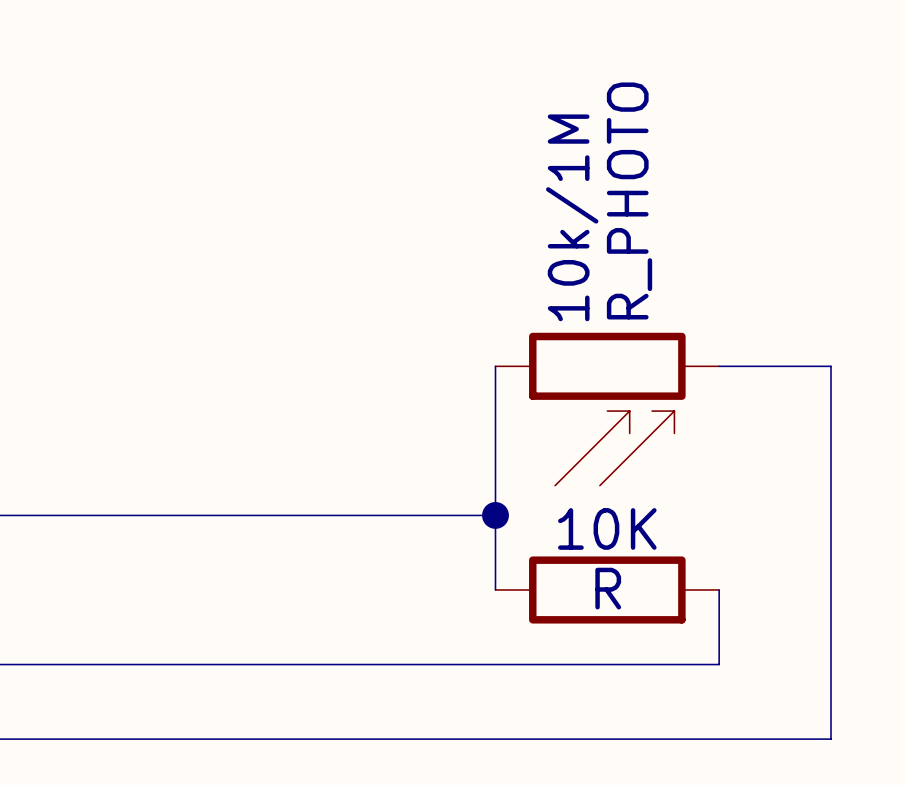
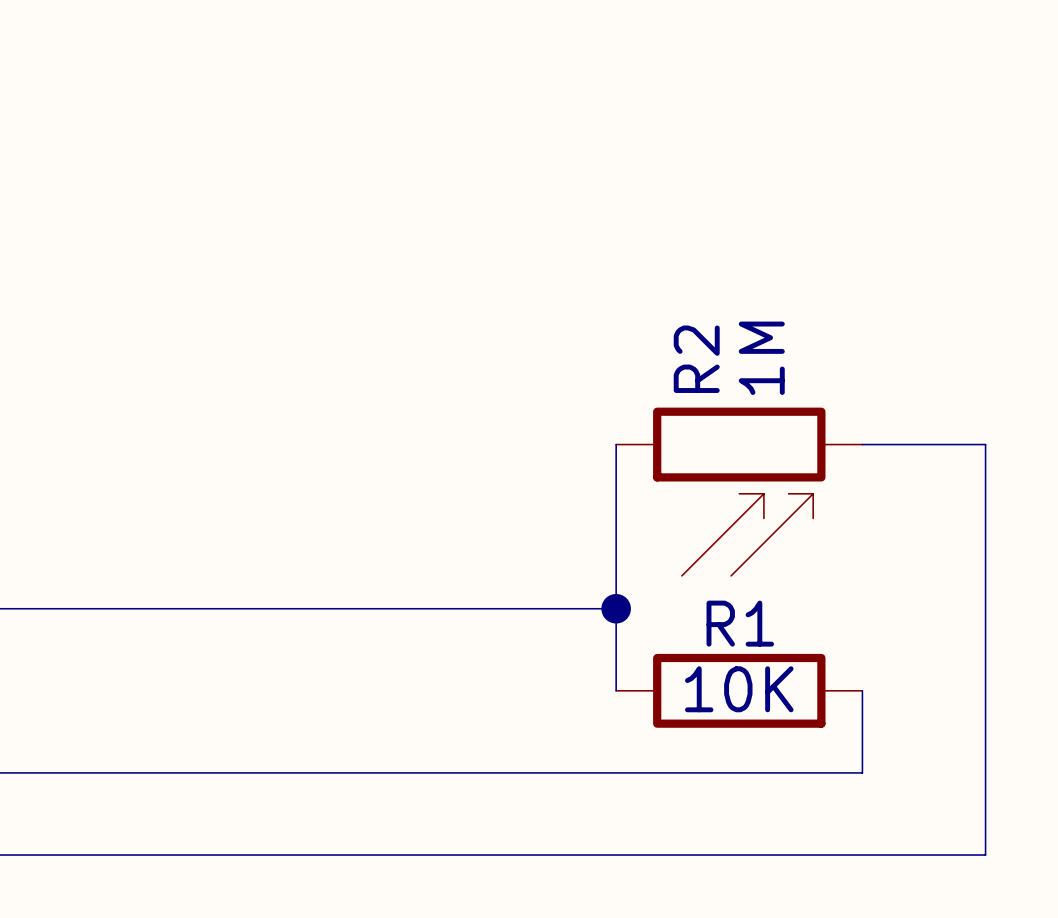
10k/1M value: R_PHOTO (629, 200) -> 1M (761, 358)
10k/1M name: 10k/1M (572, 217) -> R2 (696, 359)
10K name: 10K (607, 528) -> R1 (740, 623)
10K value: R (608, 588) -> 10K (739, 689)

